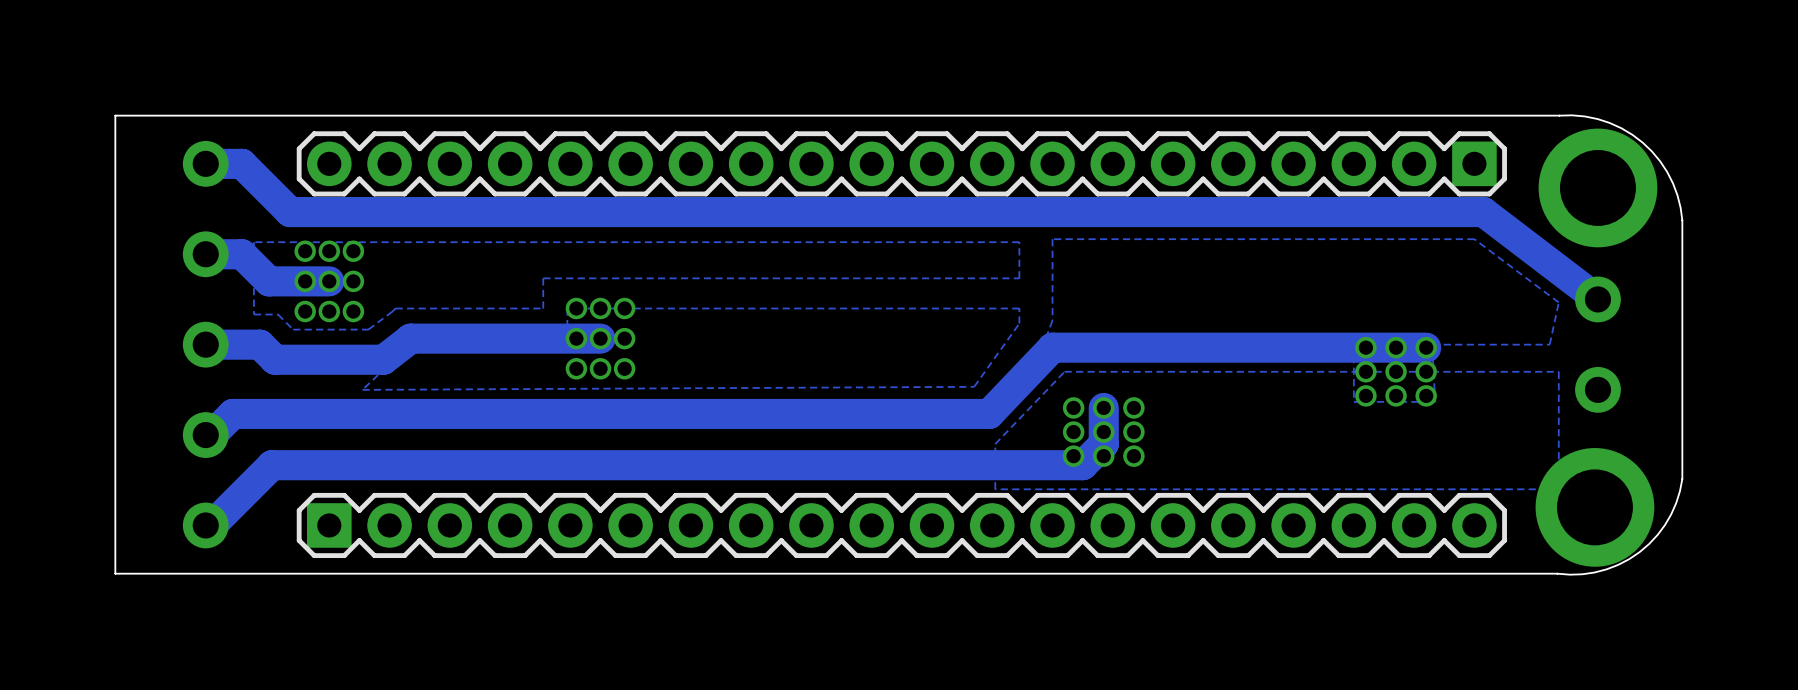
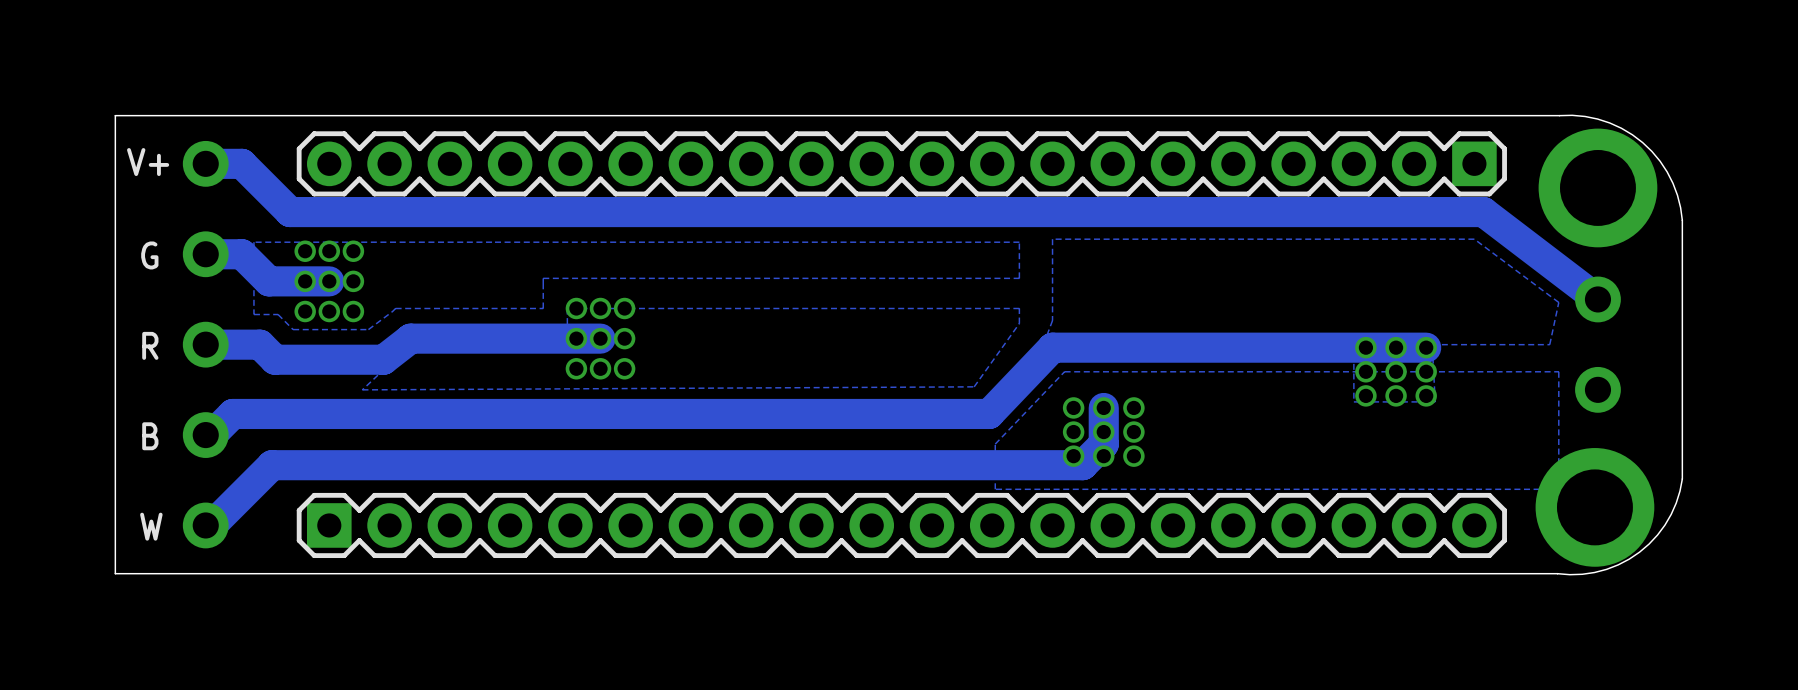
text: none -> V+ (148, 162)
text: none -> G (149, 255)
text: none -> R (150, 345)
text: none -> B (150, 436)
text: none -> W (151, 526)

